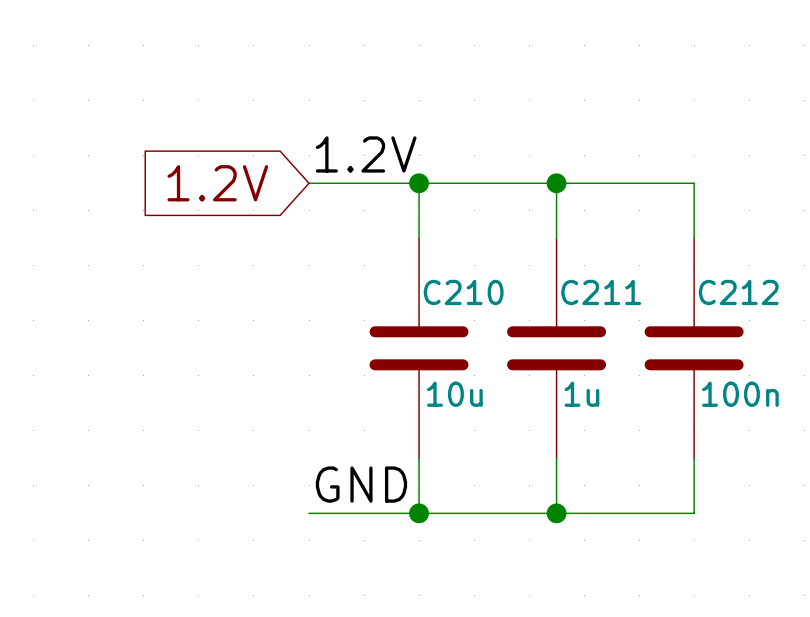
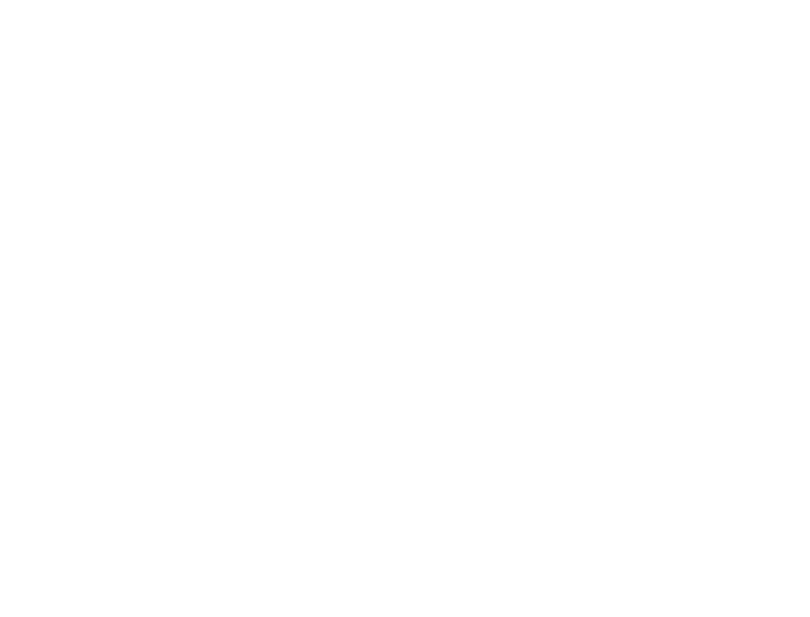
label: 1.2V (366, 154) -> none
global label: 1.2V (217, 183) -> none
wire: (309, 183) (694, 183) (694, 238) -> none
wire: (419, 183) (419, 238) -> none
junction: (419, 183) -> none
wire: (556, 183) (556, 238) -> none
junction: (556, 183) -> none
C210: 10u (419, 348) -> none
C211: 1u (556, 348) -> none
C212: 100n (694, 348) -> none
wire: (419, 458) (419, 513) -> none
wire: (556, 458) (556, 513) -> none
wire: (694, 458) (694, 513) (309, 513) -> none
label: GND (361, 484) -> none
junction: (419, 513) -> none
junction: (556, 513) -> none

